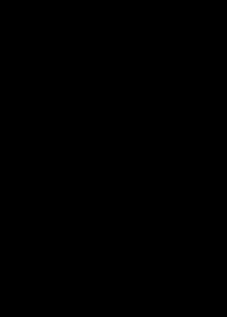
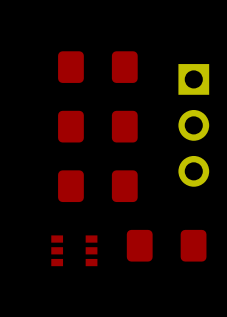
part: none -> (97, 67)
part: none -> (193, 125)
part: none -> (97, 126)
part: none -> (97, 186)
part: none -> (166, 245)
part: none -> (74, 250)

